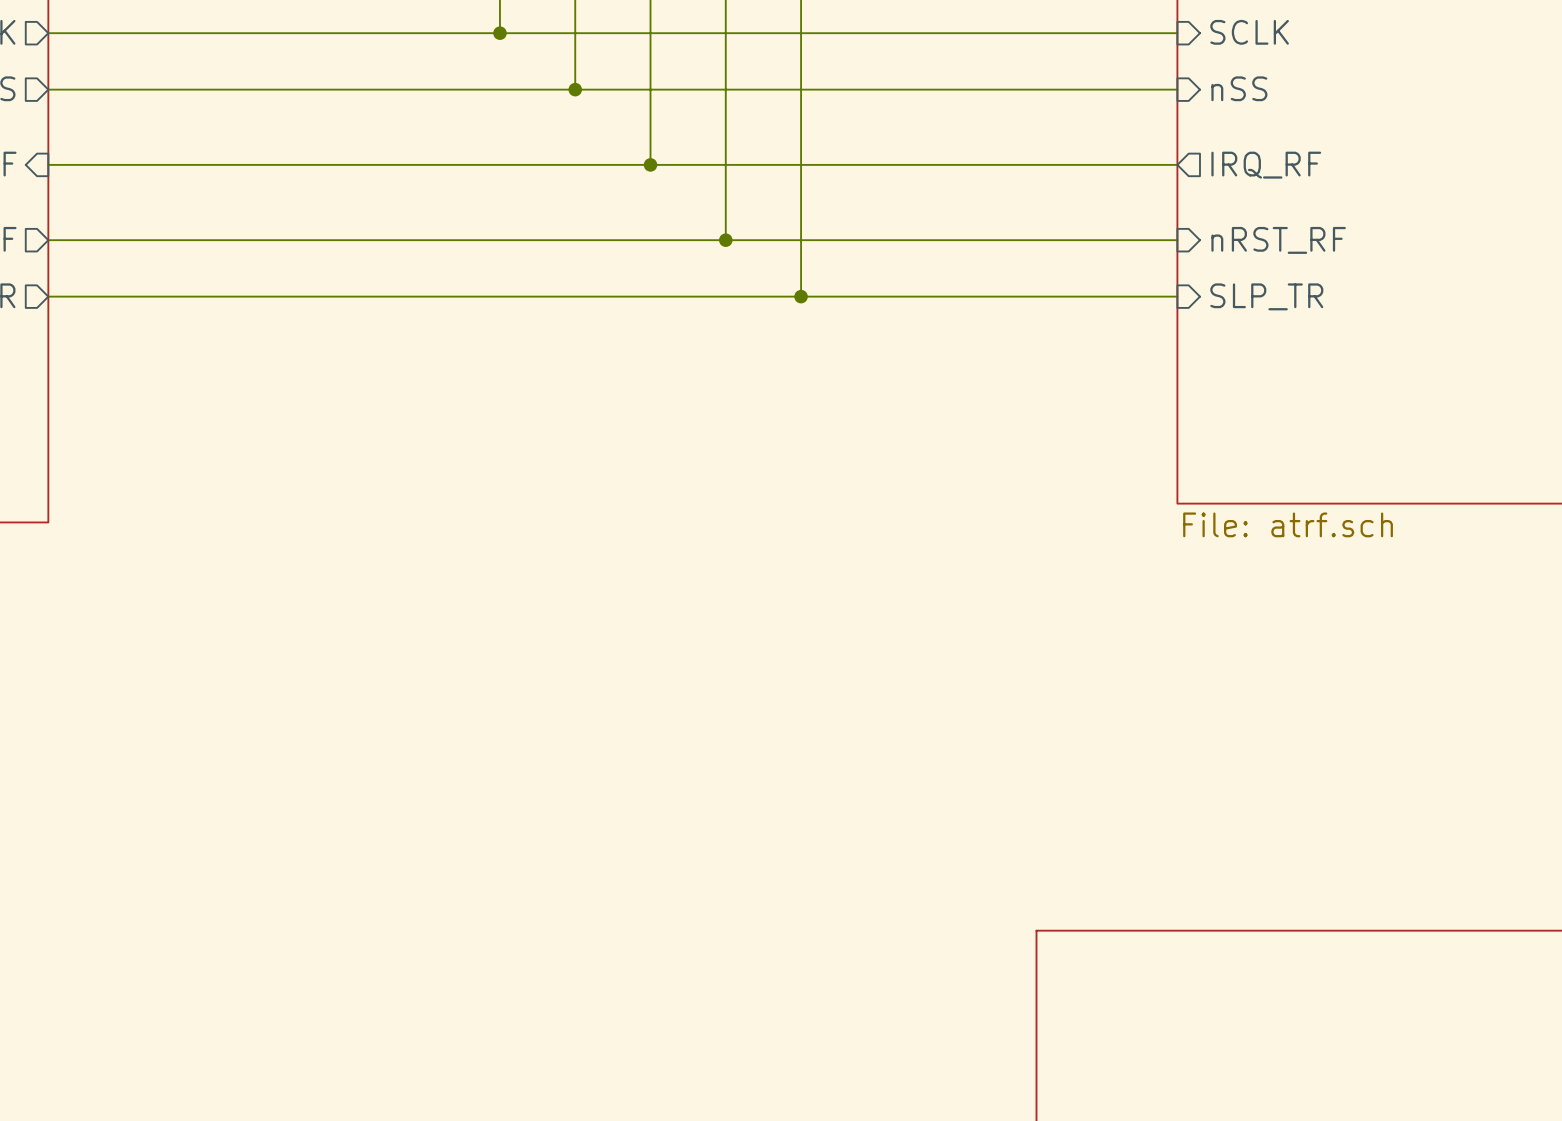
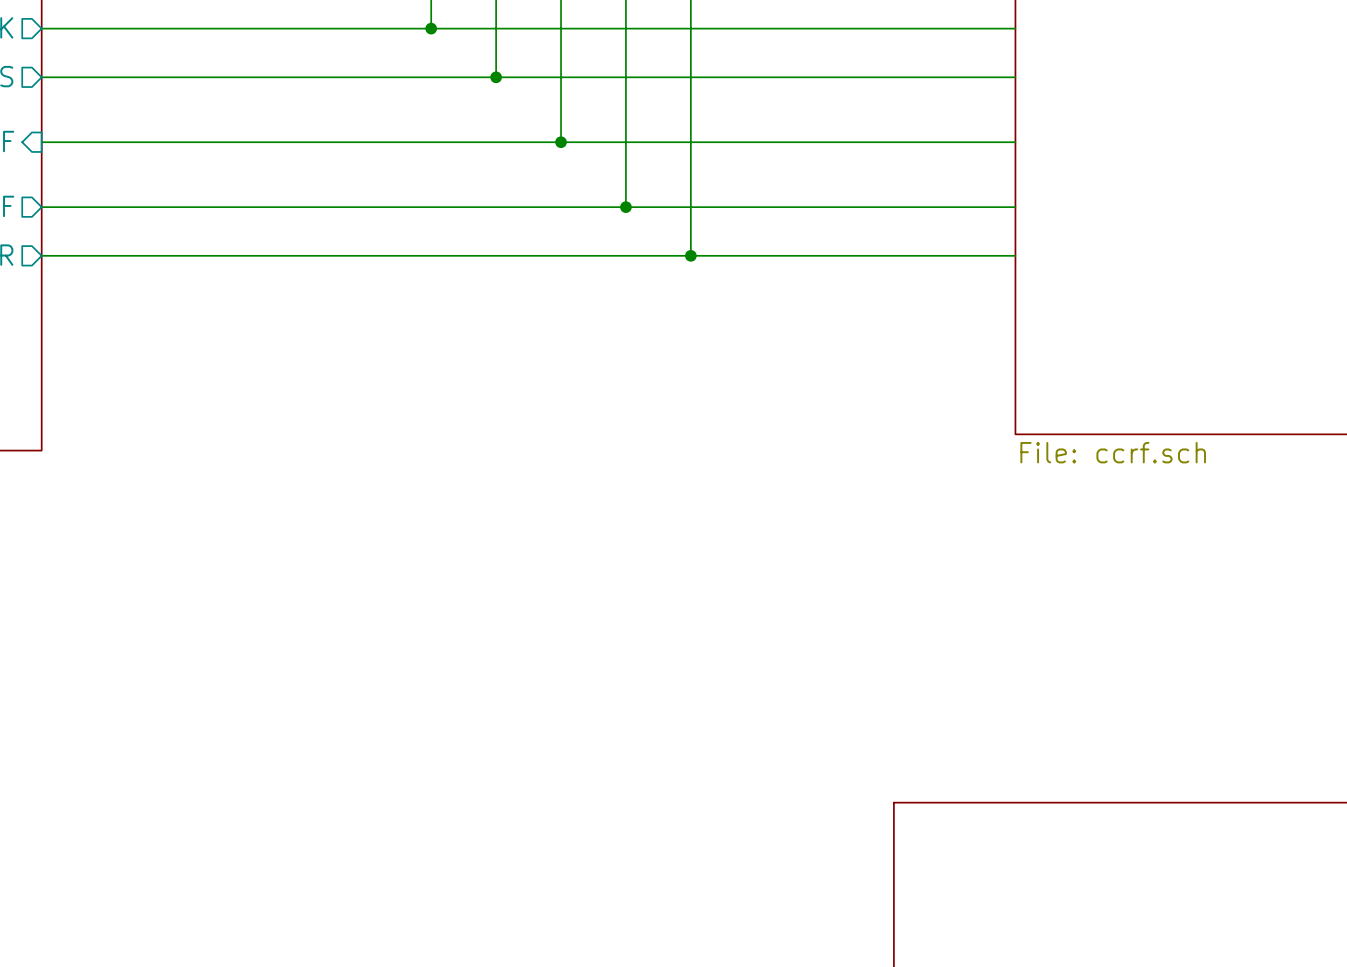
sheet pin: SCLK (1249, 32) -> none
sheet pin: nSS (1239, 88) -> none
sheet pin: IRQ_RF (1266, 165) -> none
sheet pin: nRST_RF (1278, 240) -> none
sheet pin: SLP_TR (1266, 296) -> none
sheet value: File: atrf.sch (1288, 524) -> File: ccrf.sch (1113, 452)

